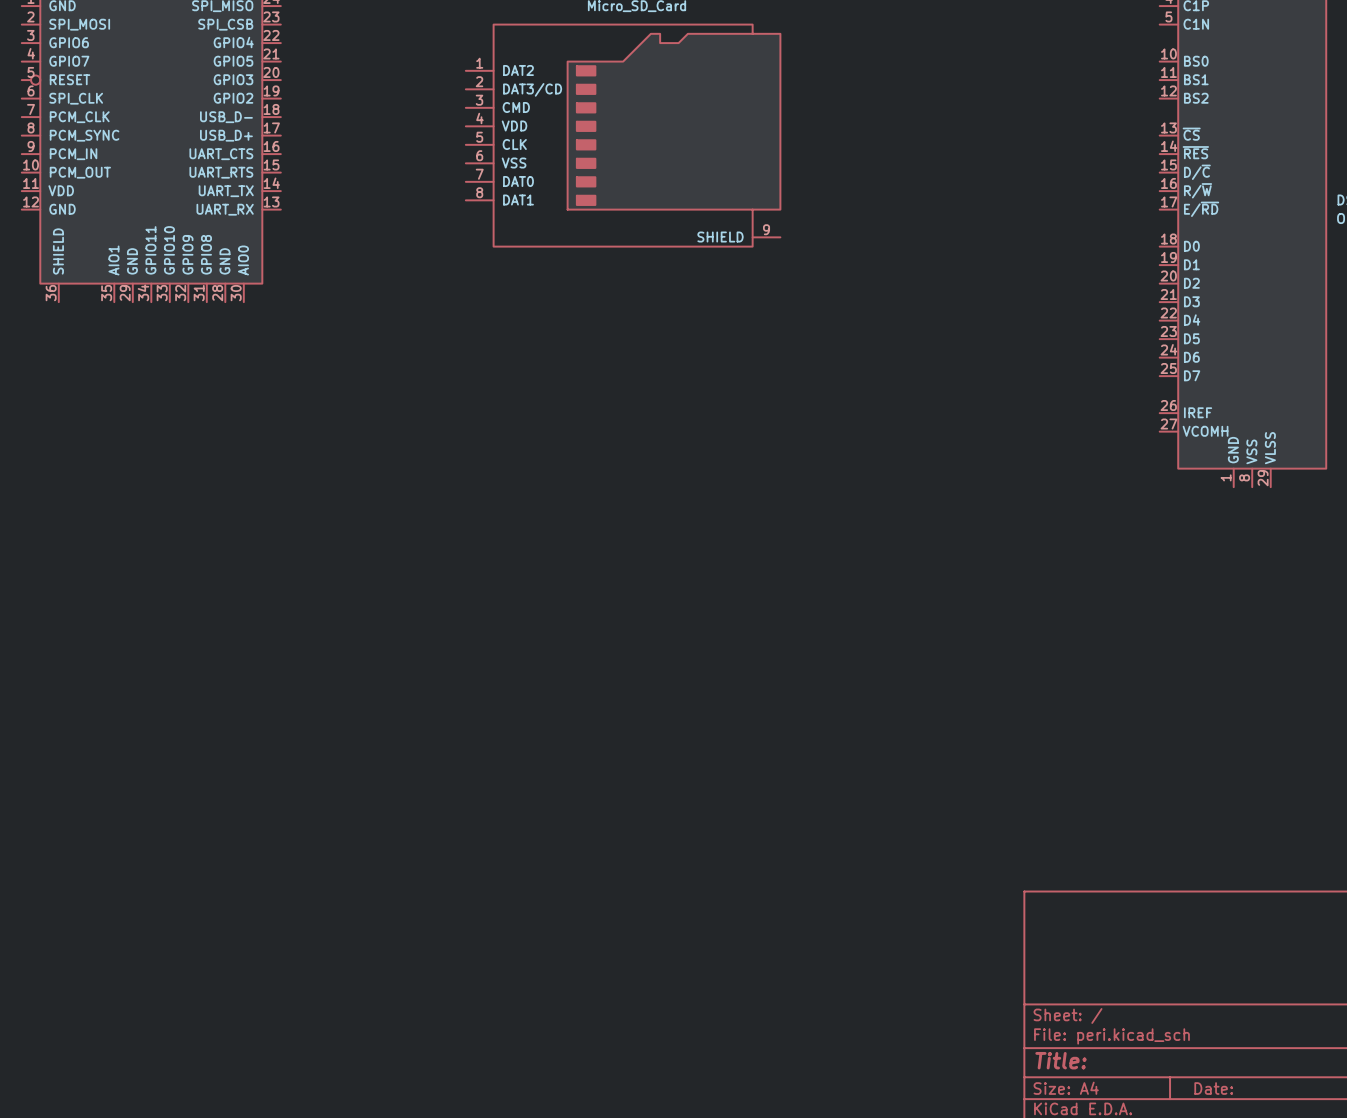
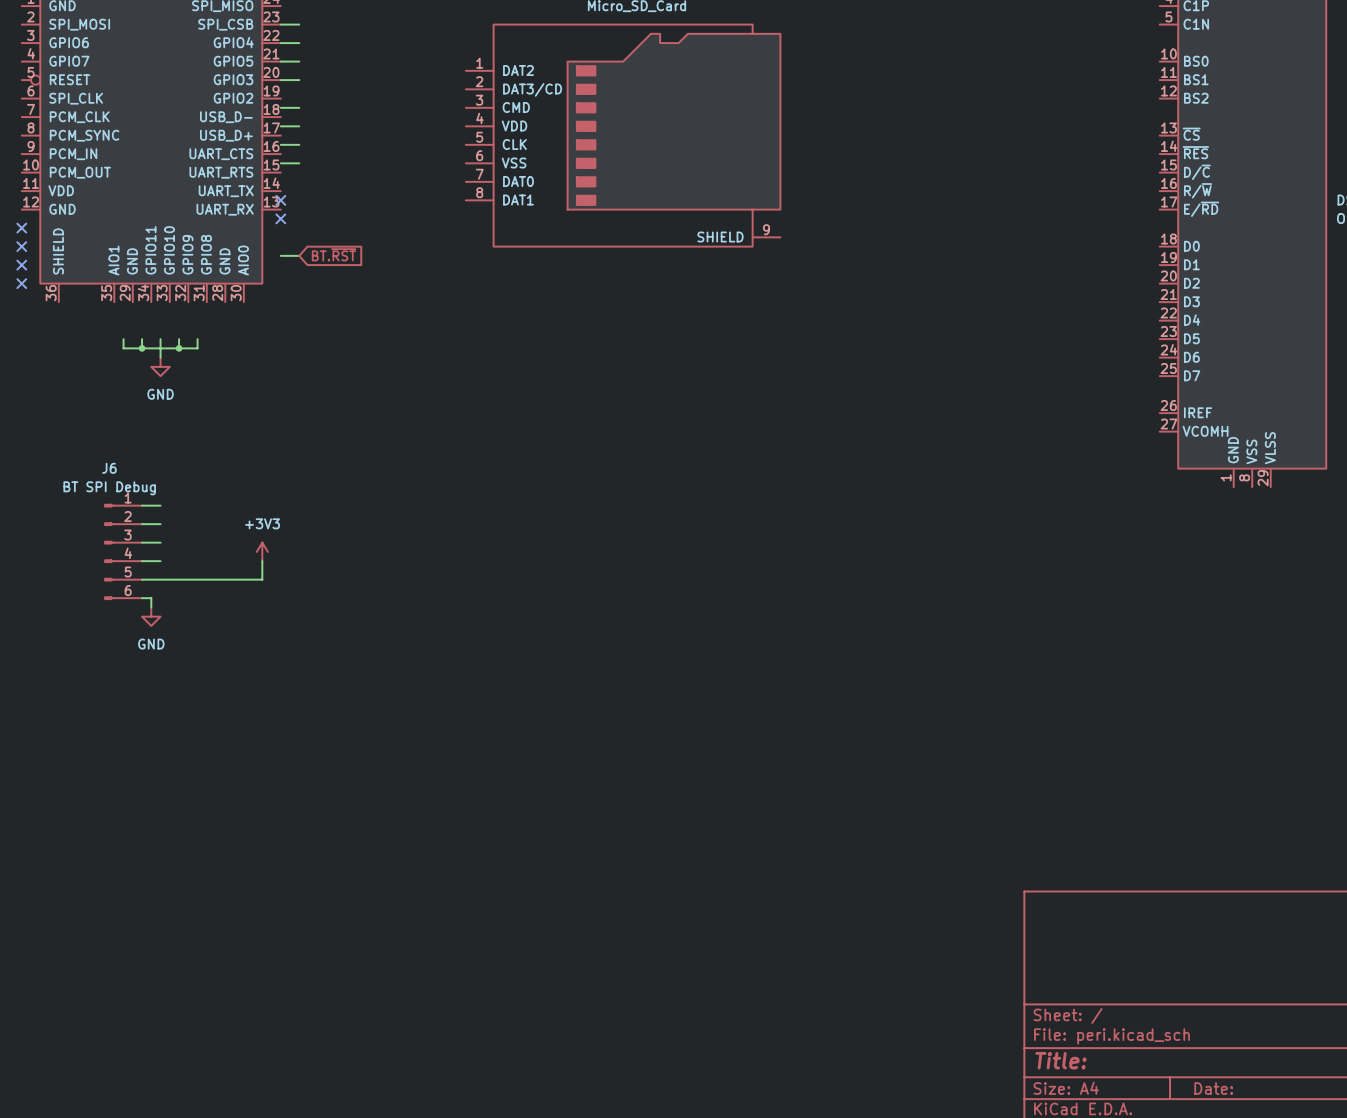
wire: none -> (280, 24) (299, 24)
wire: none -> (280, 43) (299, 43)
wire: none -> (280, 61) (299, 61)
wire: none -> (280, 80) (299, 80)
wire: none -> (280, 107) (299, 107)
wire: none -> (280, 126) (299, 126)
wire: none -> (280, 144) (299, 144)
wire: none -> (280, 163) (299, 163)
no-connect mark: none -> (280, 200)
no-connect mark: none -> (280, 218)
no-connect mark: none -> (21, 228)
no-connect mark: none -> (21, 246)
global label: none -> BT.~{RST} (334, 254)
wire: none -> (280, 255) (299, 255)
no-connect mark: none -> (21, 265)
no-connect mark: none -> (21, 283)
wire: none -> (123, 339) (123, 348) (197, 348) (197, 339)
wire: none -> (142, 339) (142, 348)
wire: none -> (160, 339) (160, 357)
wire: none -> (179, 339) (179, 348)
junction: none -> (142, 348)
junction: none -> (179, 348)
power symbol: none -> GND (160, 366)
wire: none -> (142, 505) (160, 505)
wire: none -> (142, 524) (160, 524)
wire: none -> (142, 542) (160, 542)
J6: none -> BT SPI Debug (123, 551)
power symbol: none -> +3V3 (262, 551)
wire: none -> (142, 561) (160, 561)
wire: none -> (262, 561) (262, 579) (142, 579)
wire: none -> (142, 598) (151, 598) (151, 607)
power symbol: none -> GND (151, 616)

